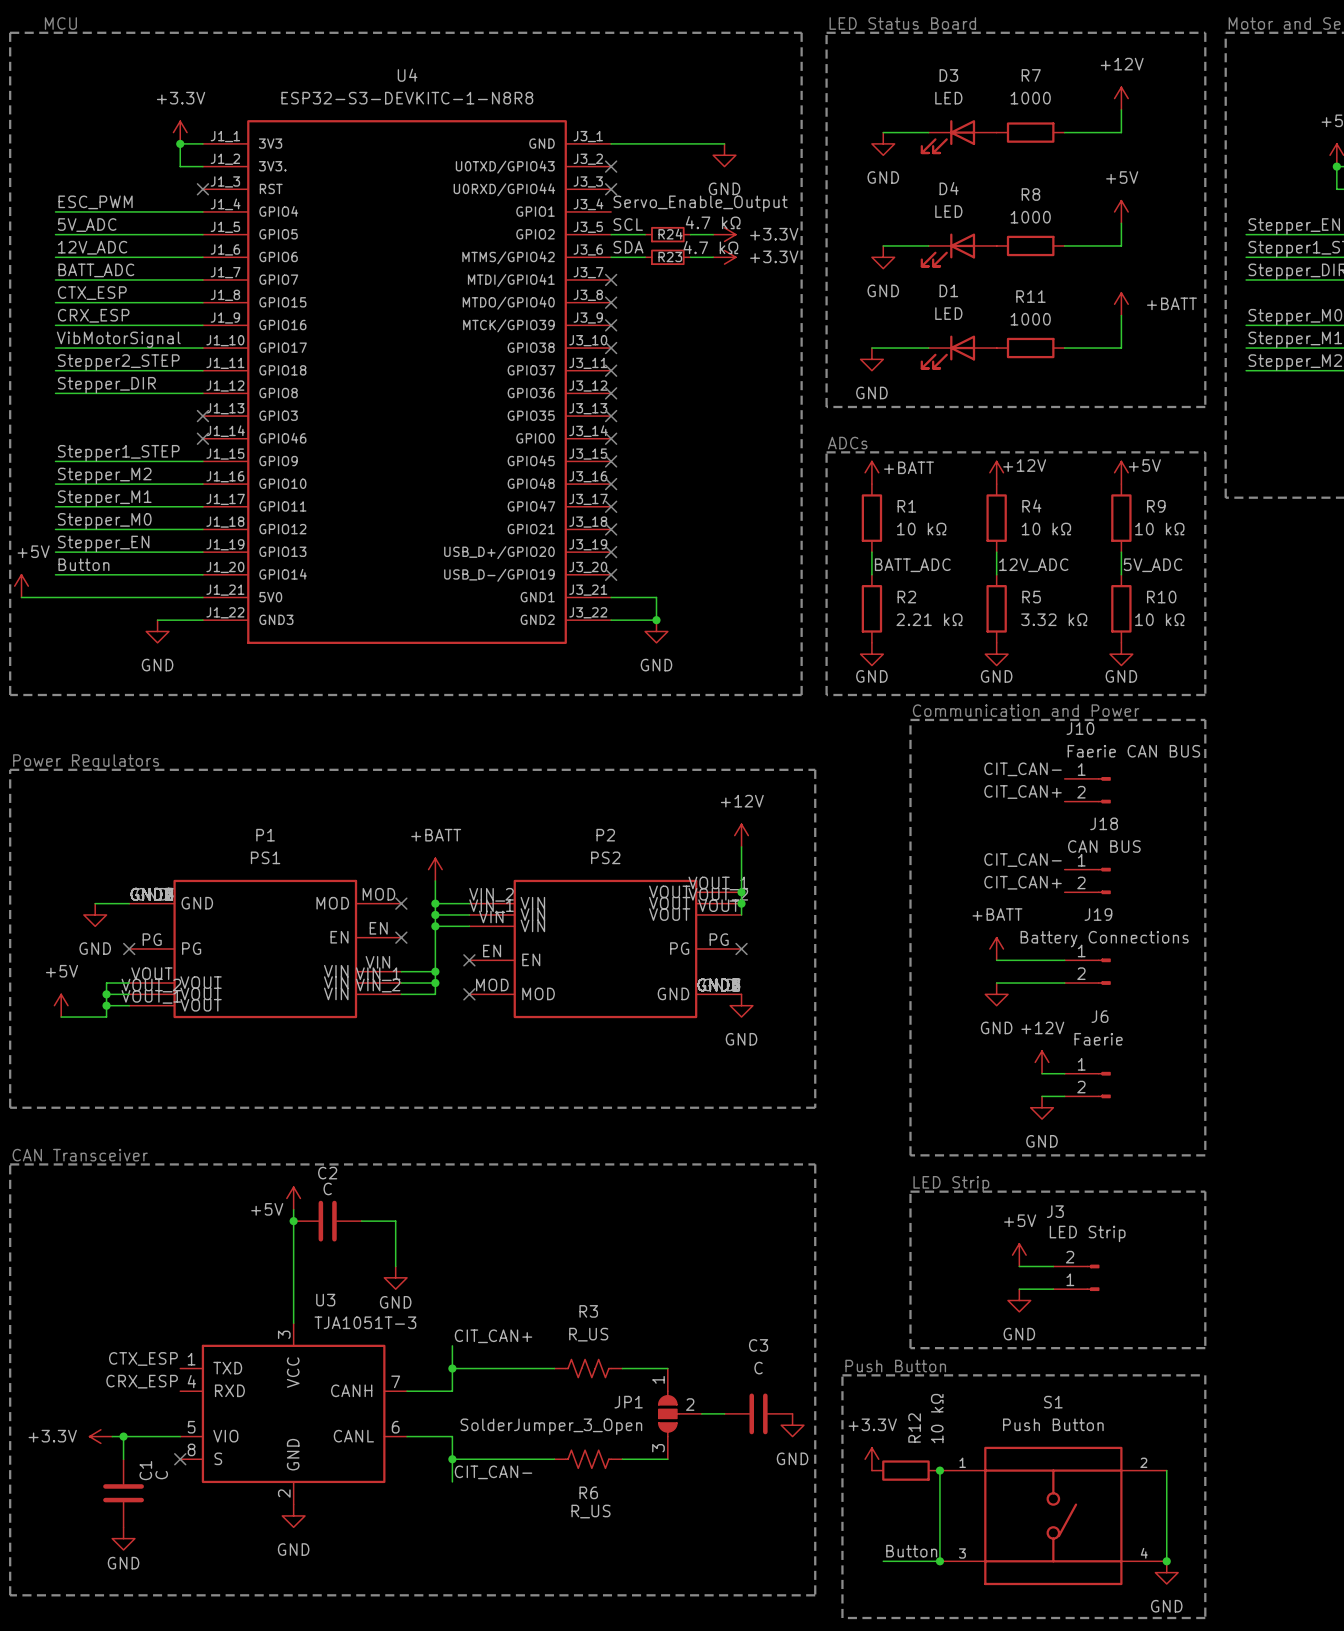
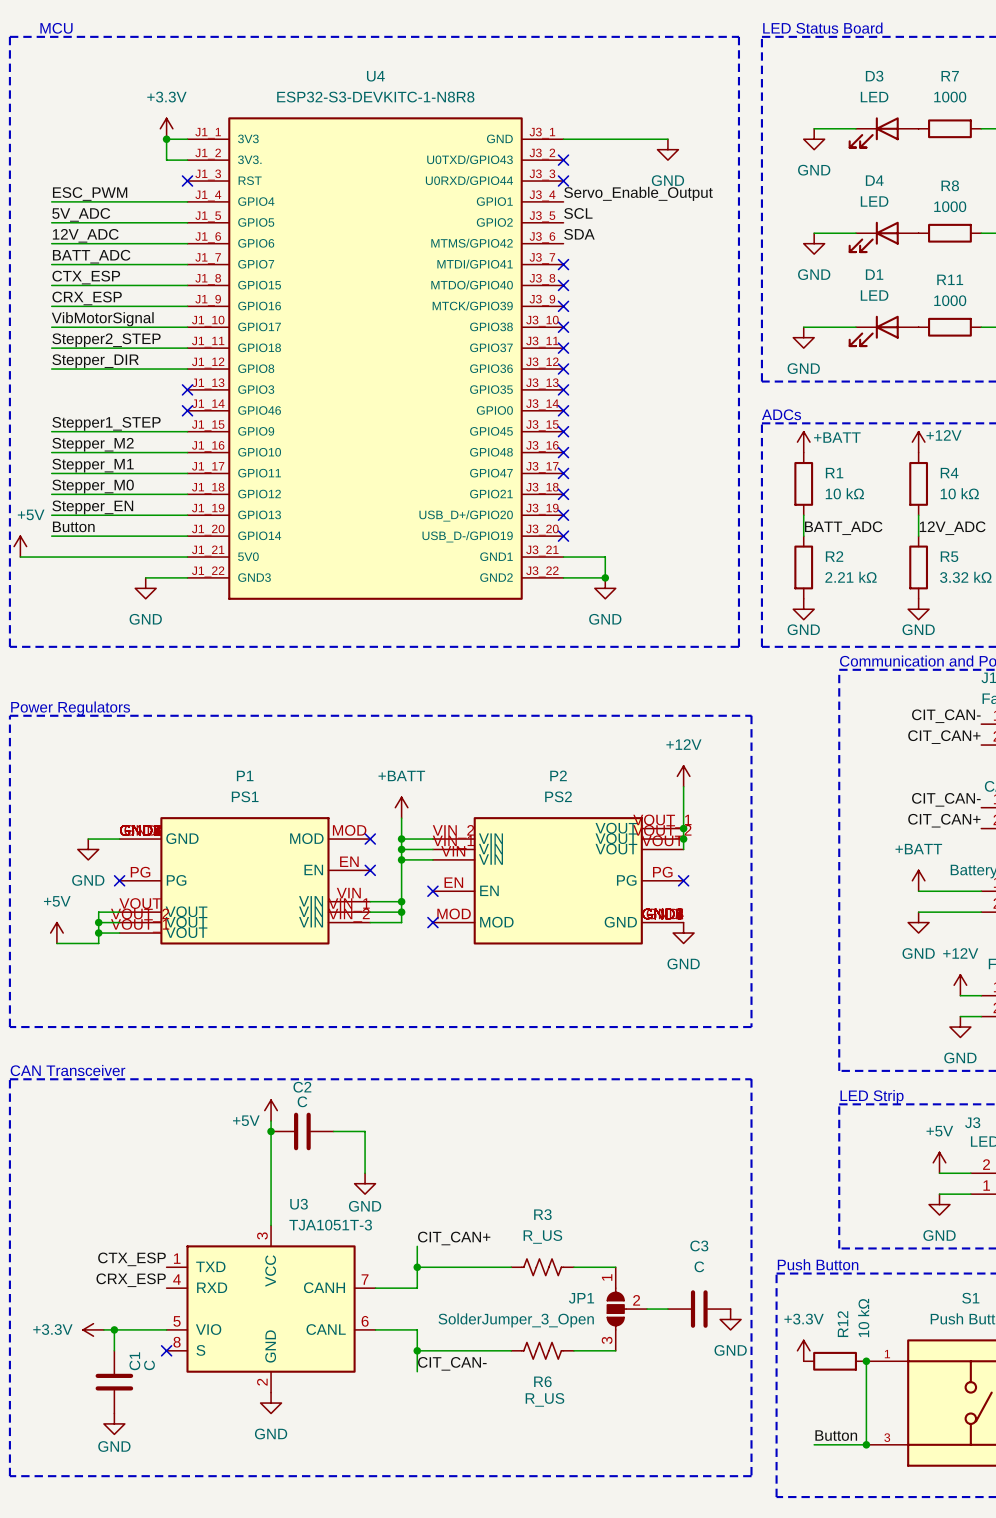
wire: (611, 234) (645, 234) -> none
R24: 4.7 kΩ (667, 234) -> none
wire: (690, 234) (713, 234) -> none
power symbol: +3.3V (724, 234) -> none
wire: (611, 257) (645, 257) -> none
R23: 4.7 kΩ (667, 257) -> none
wire: (690, 257) (713, 257) -> none
power symbol: +3.3V (724, 257) -> none

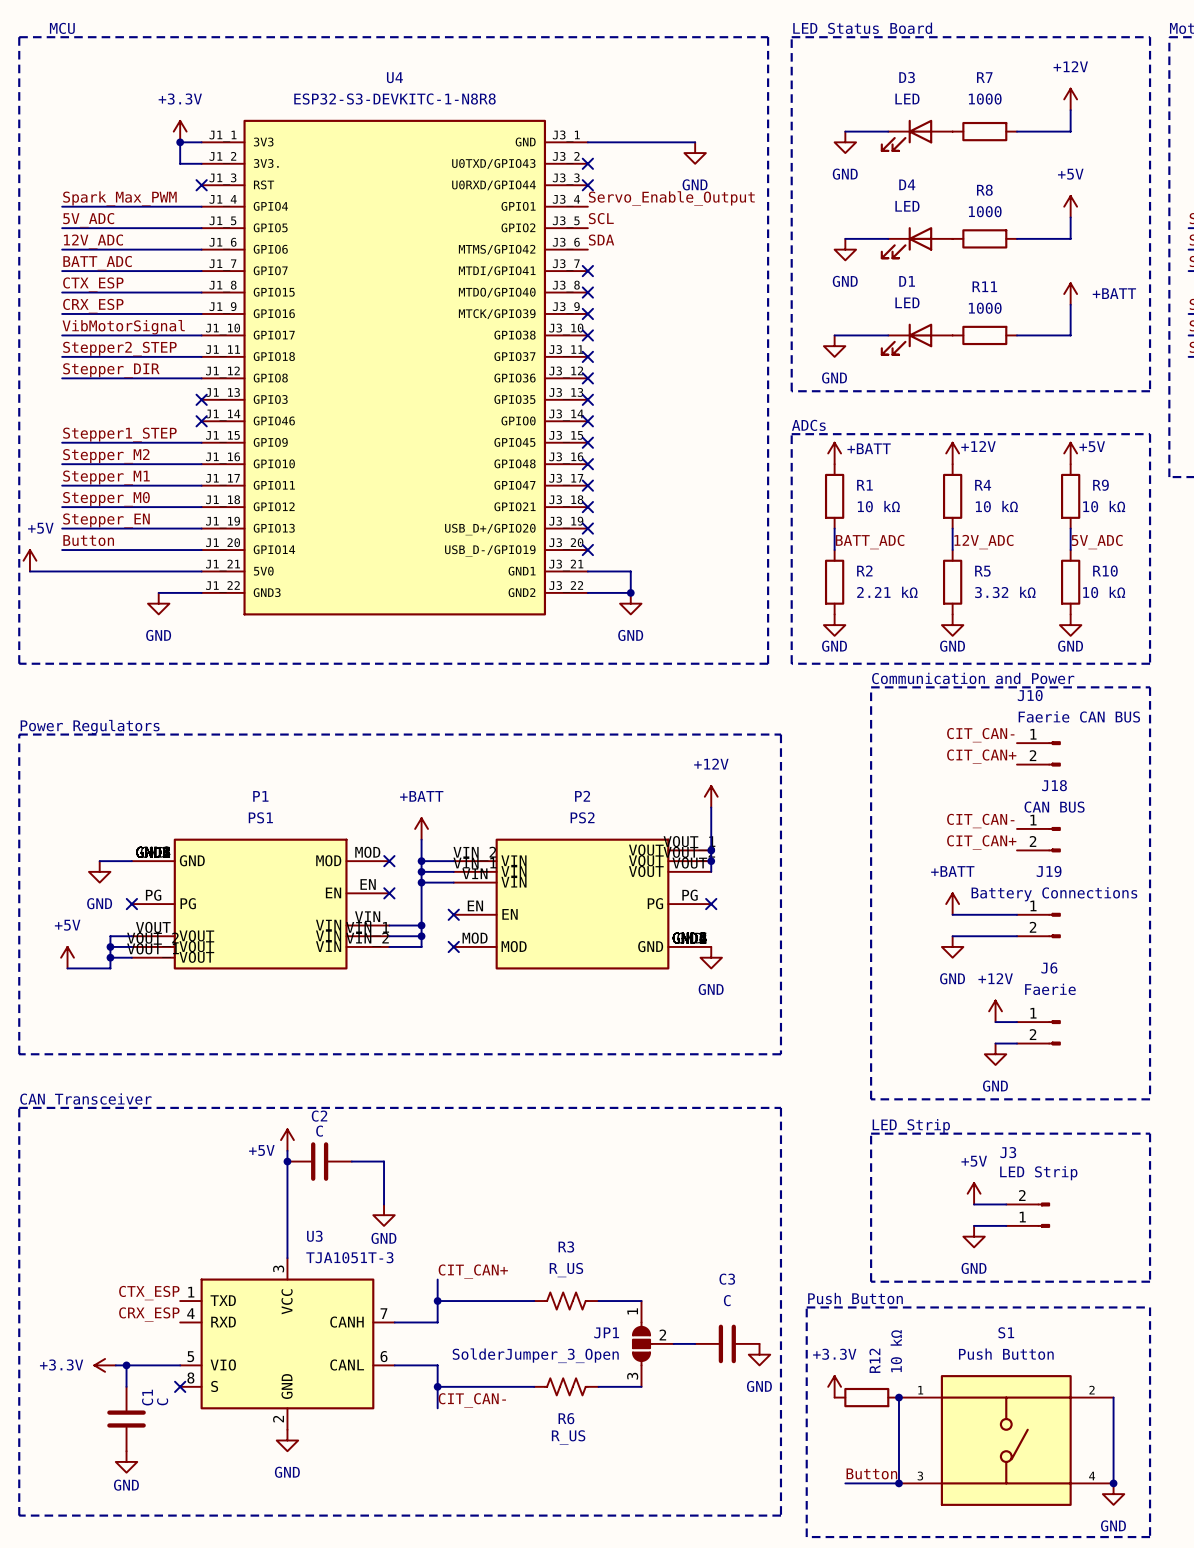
label: ESC_PWM (90, 194) -> Spark_Max_PWM (119, 198)

